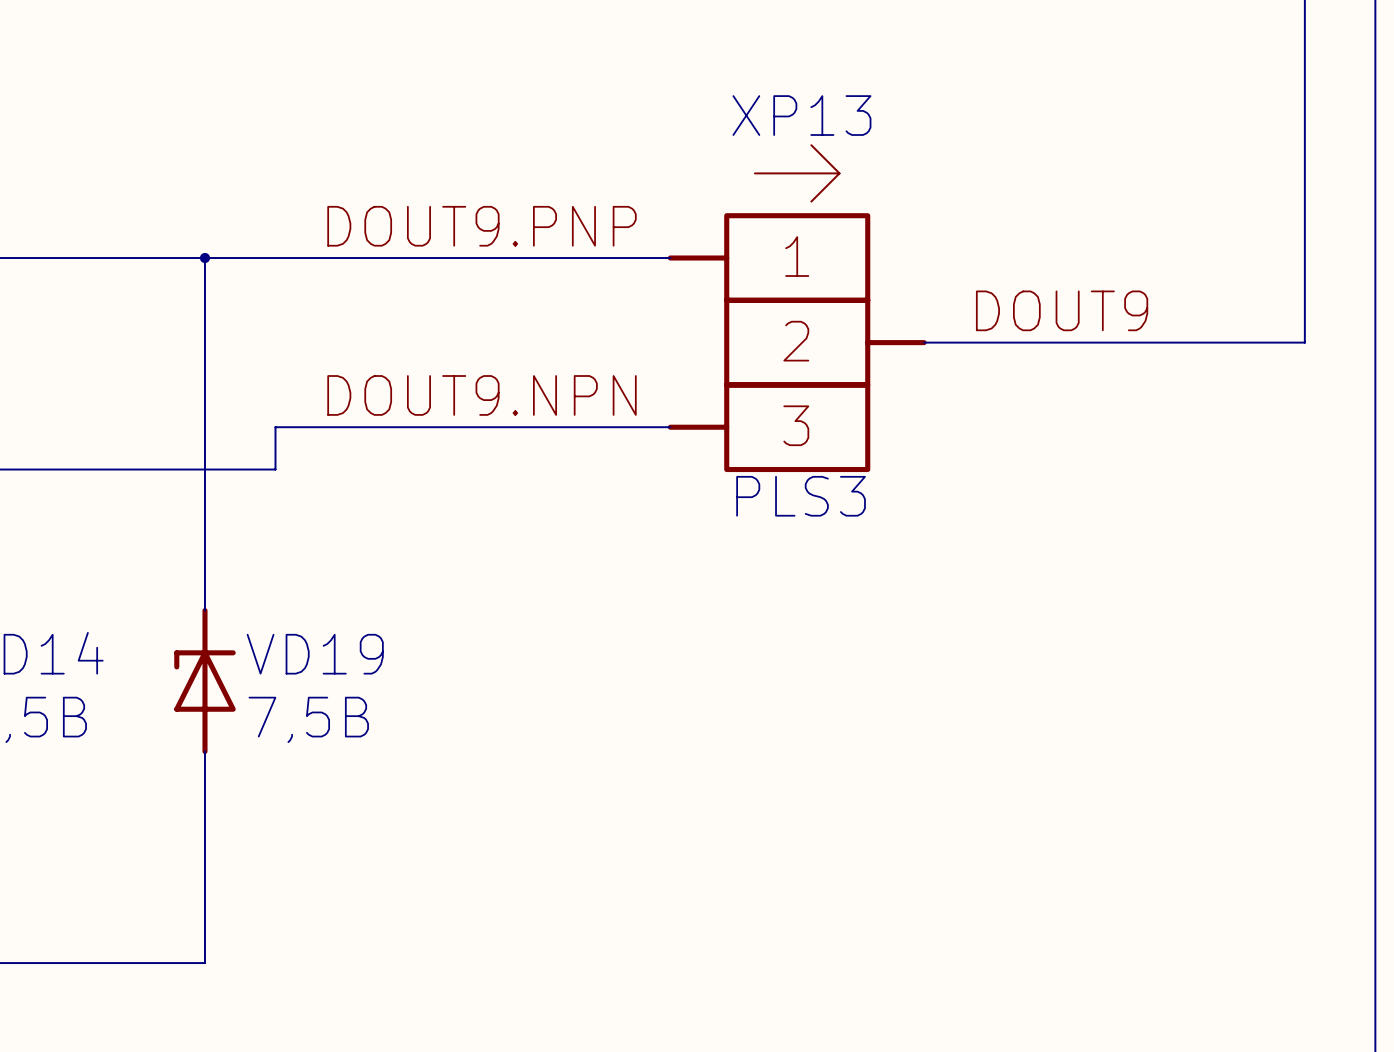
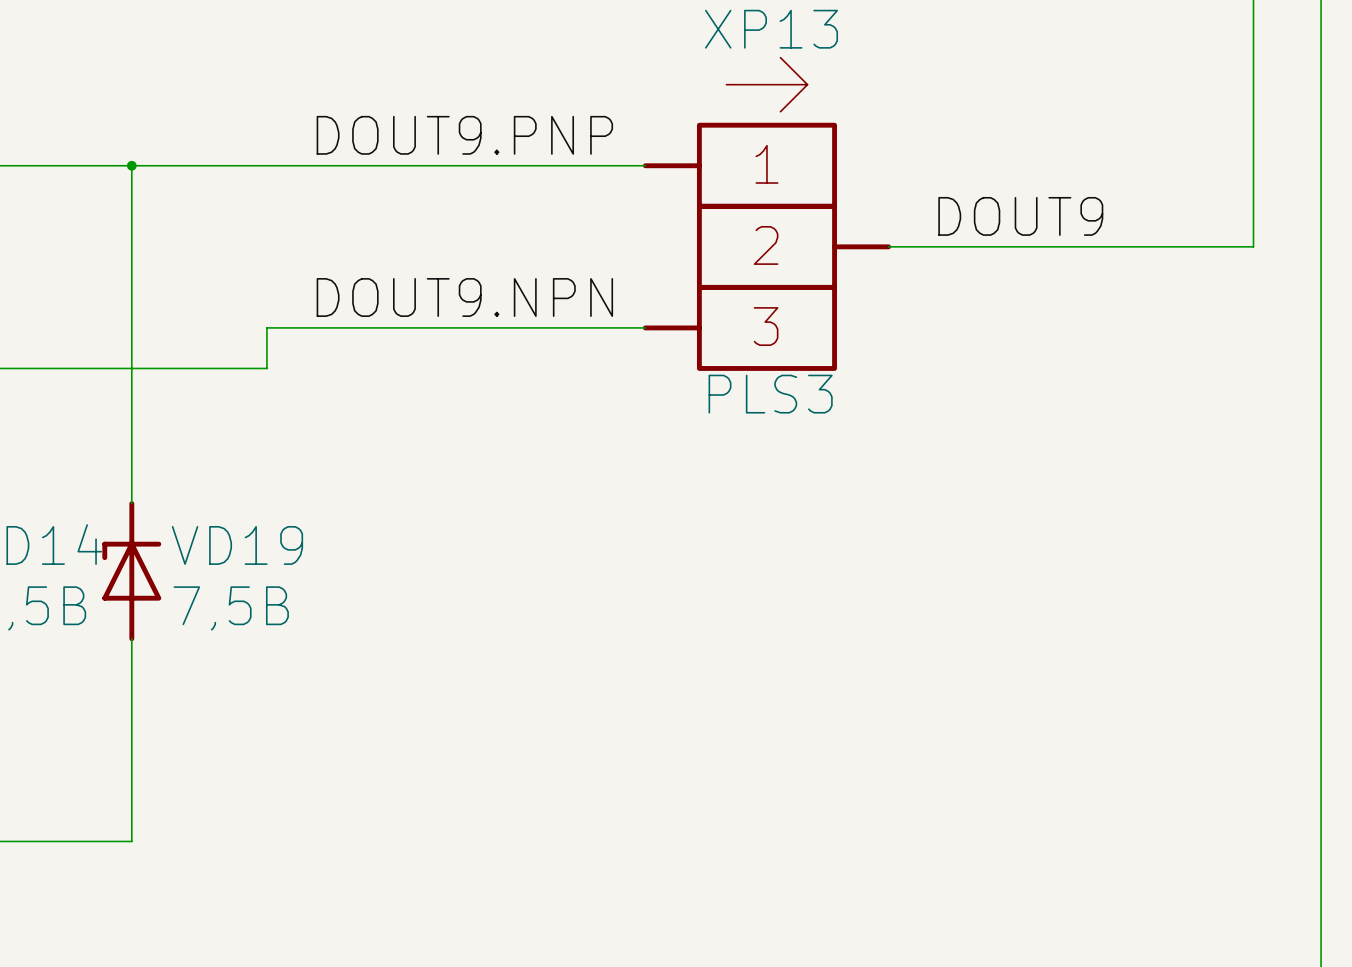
junction: none -> (131, 165)
wire: (204, 258) (204, 610) -> (131, 165) (131, 503)
junction: (204, 258) -> none
VD19 position: (204, 681) -> (131, 571)
wire: (204, 751) (204, 963) (134, 963) -> (131, 638) (131, 841)

